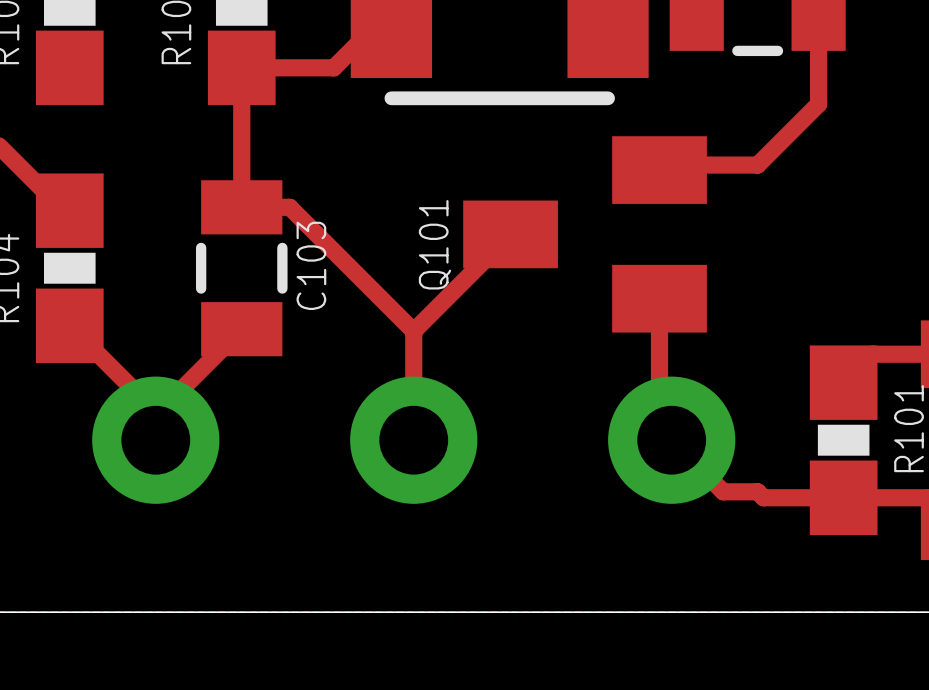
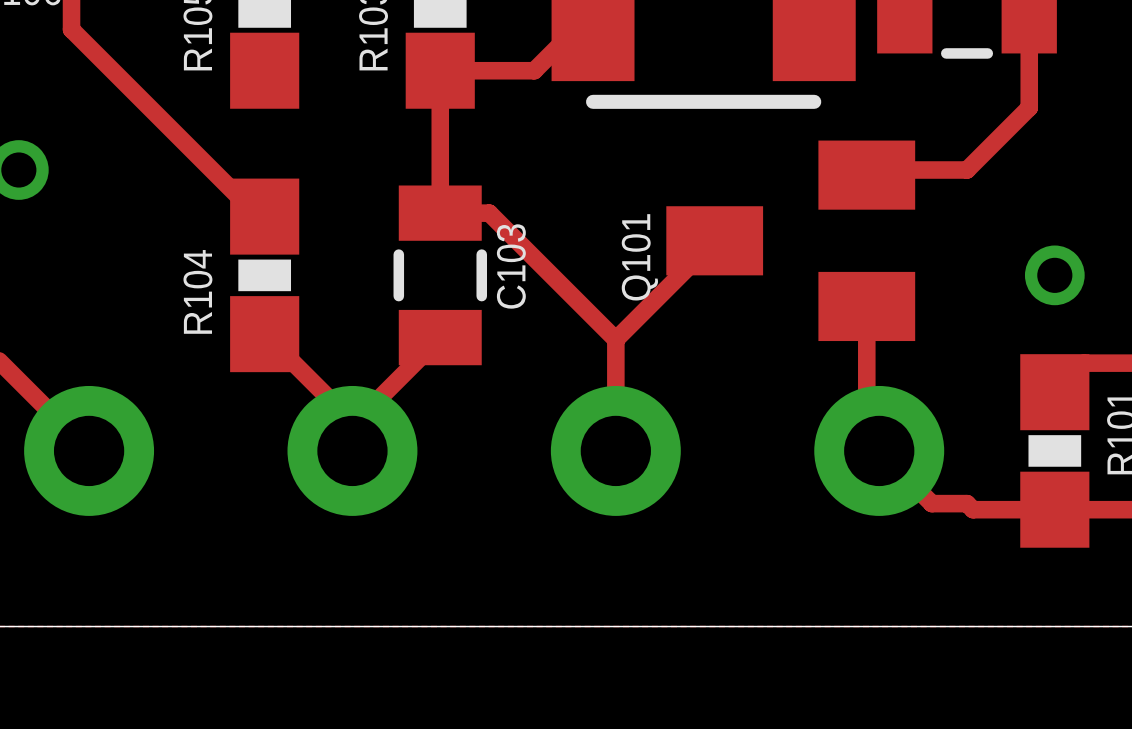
via: none -> (1054, 275)

